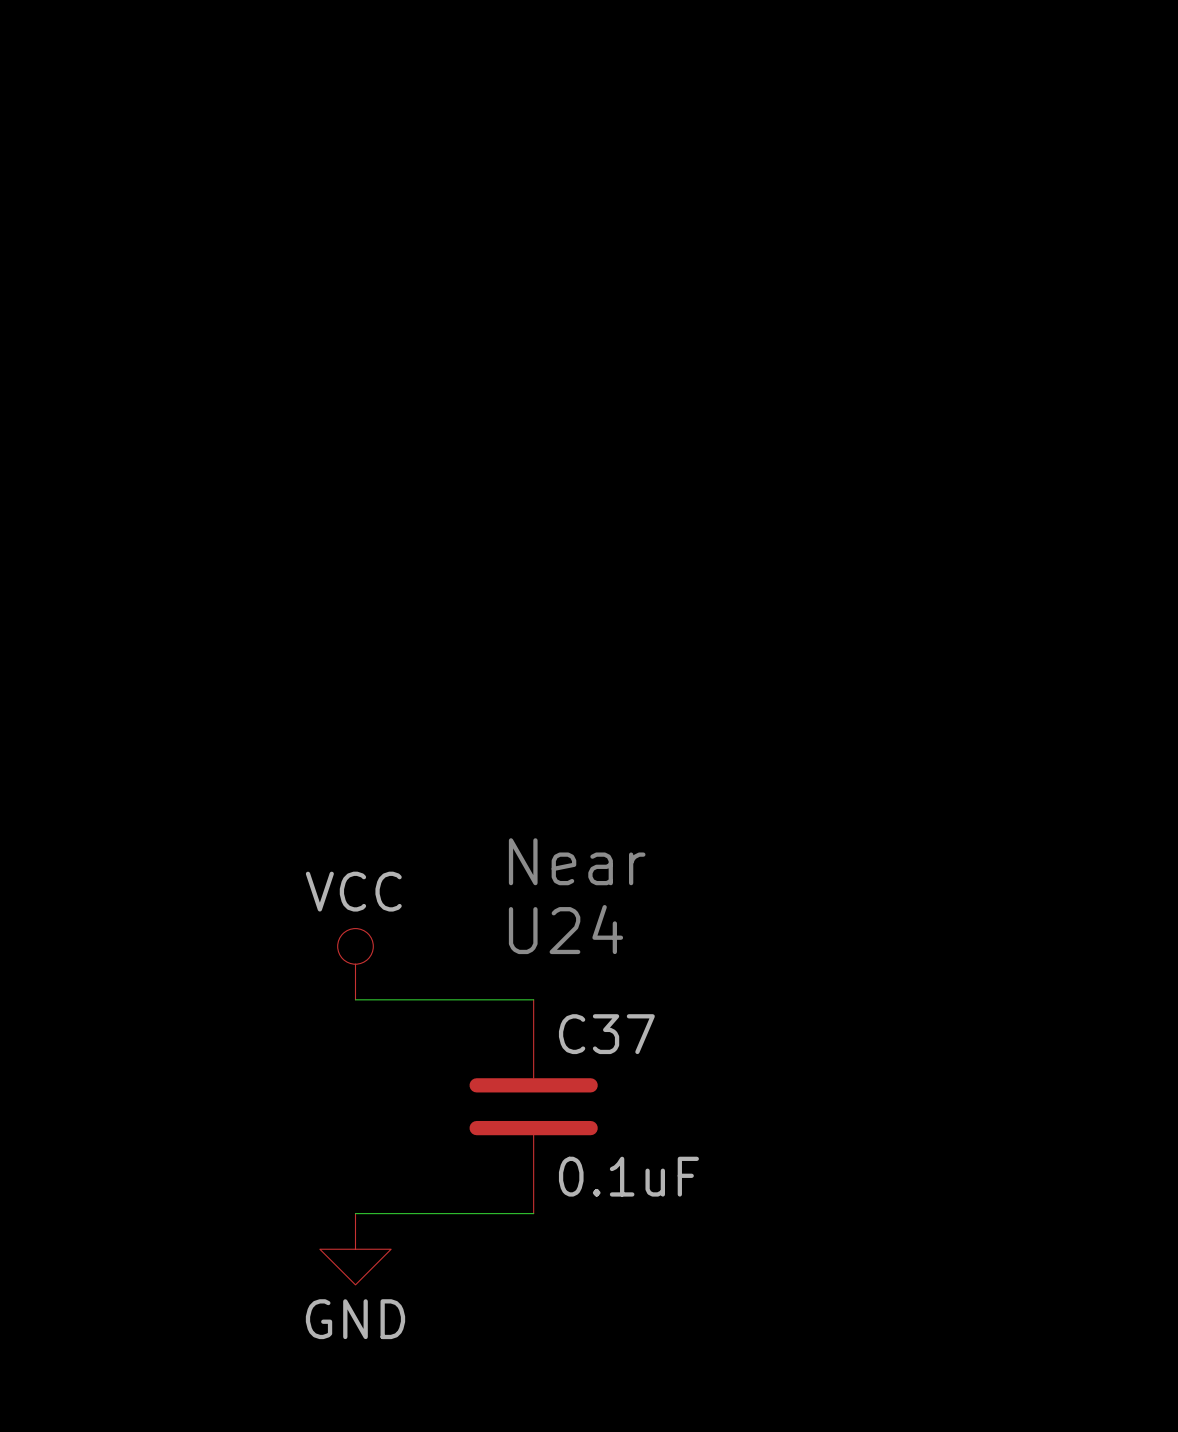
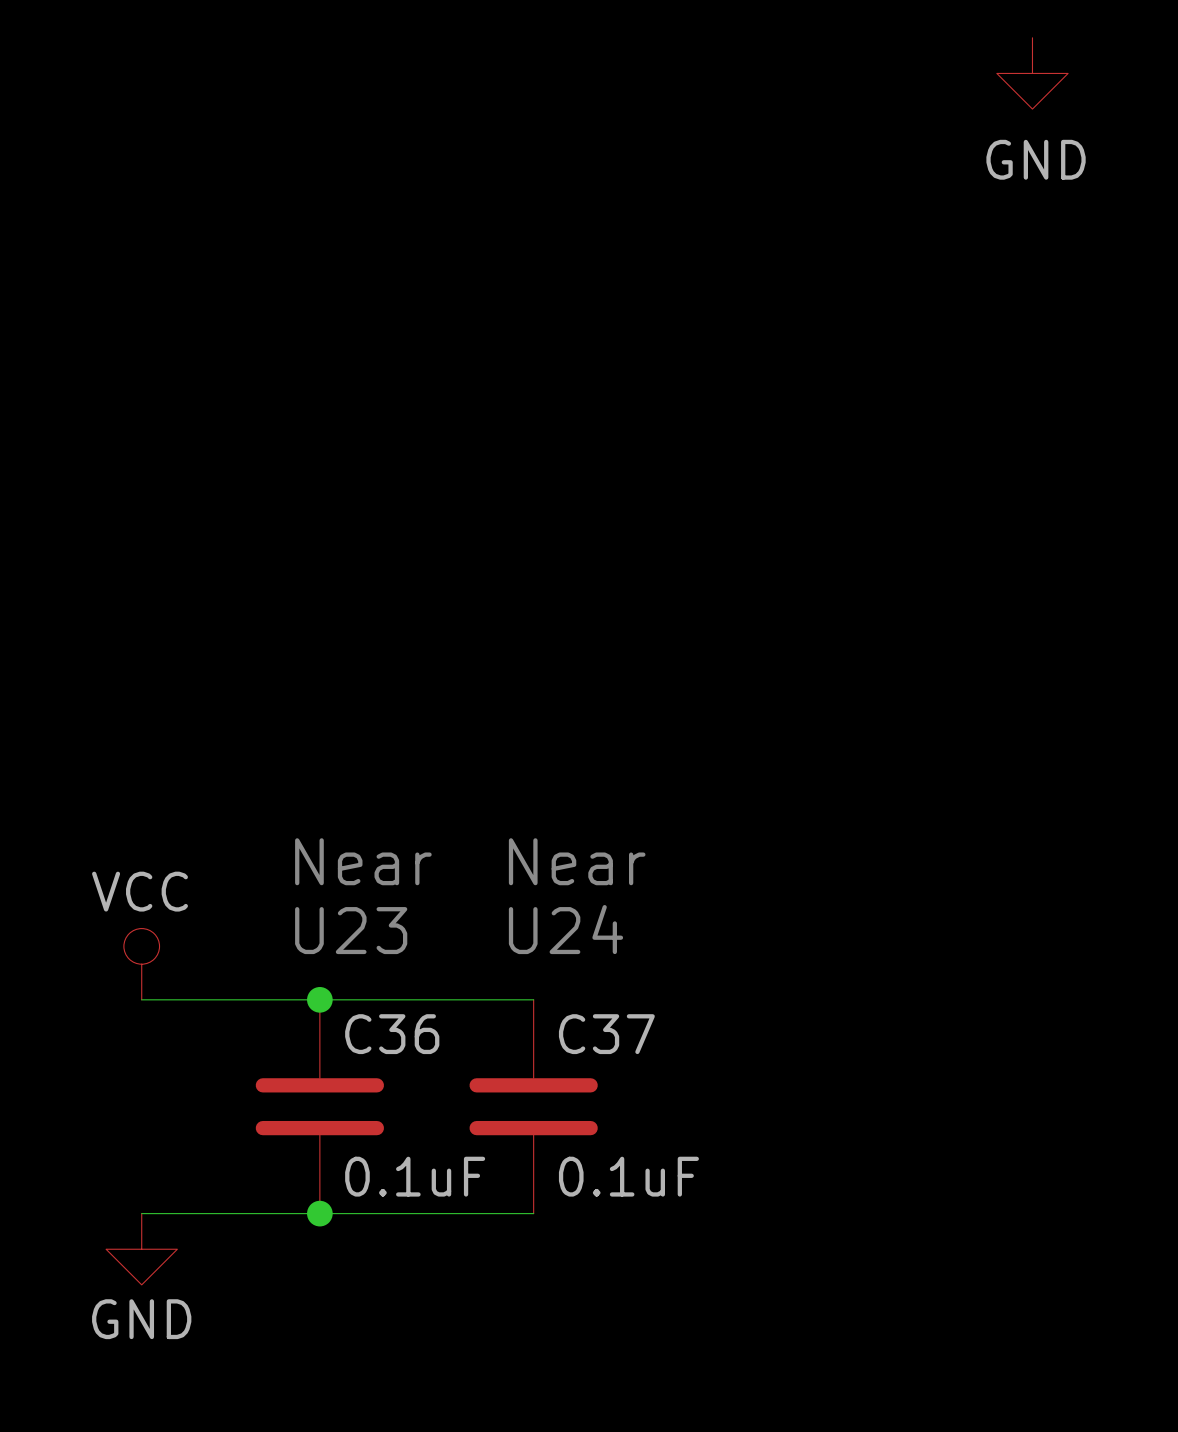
power symbol: none -> GND (1032, 73)
text: none -> Near (363, 861)
text: none -> U23 (351, 930)
power symbol position: VCC (355, 964) -> VCC (141, 964)
wire: none -> (141, 999) (355, 999)
junction: none -> (319, 999)
C36: none -> 0.1uF (319, 1106)
wire: none -> (141, 1213) (355, 1213)
junction: none -> (319, 1213)
power symbol position: GND (355, 1249) -> GND (141, 1249)

